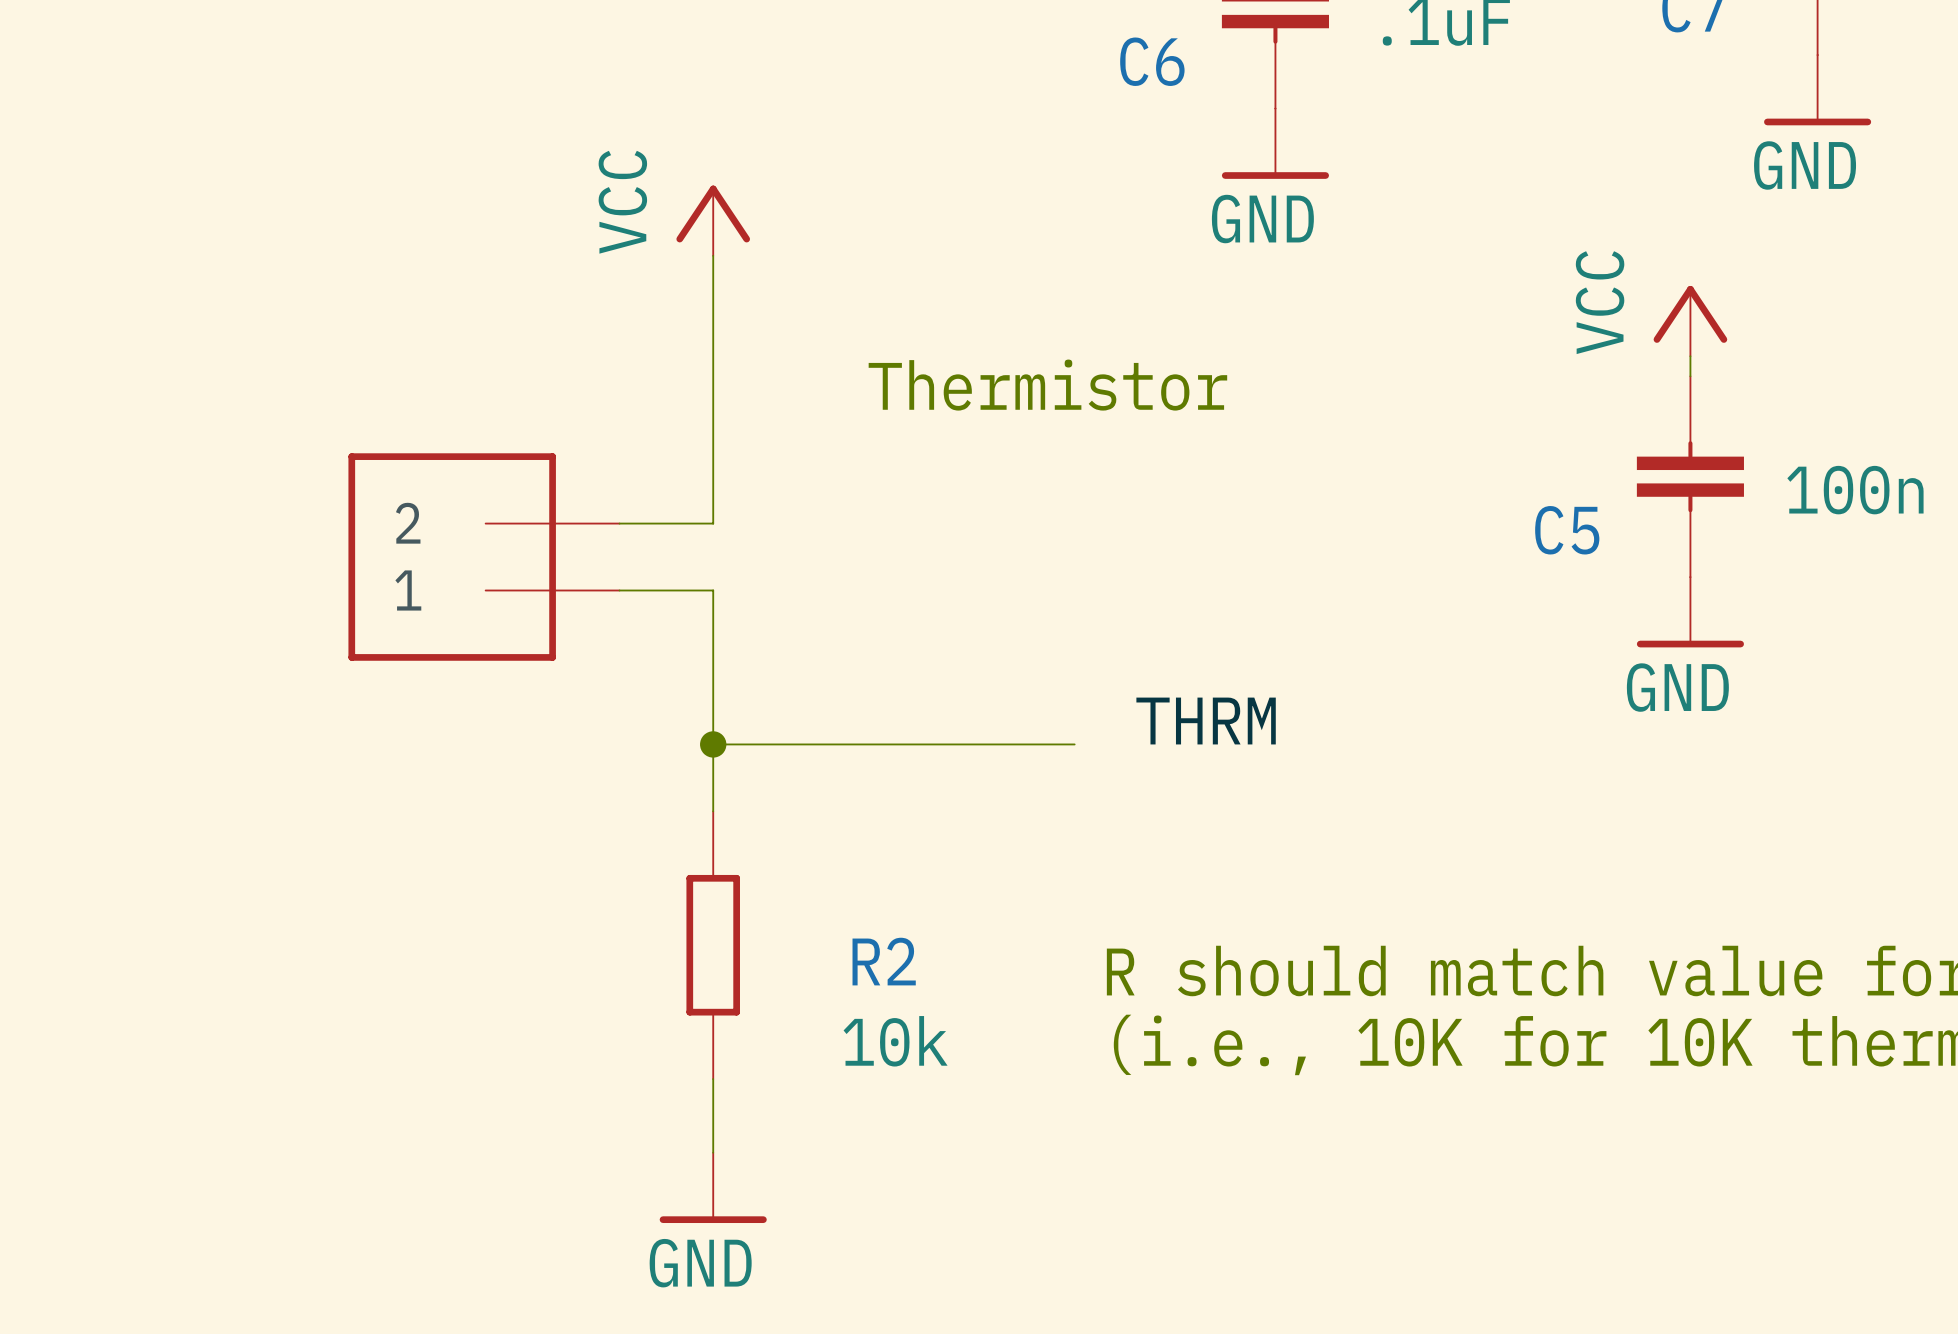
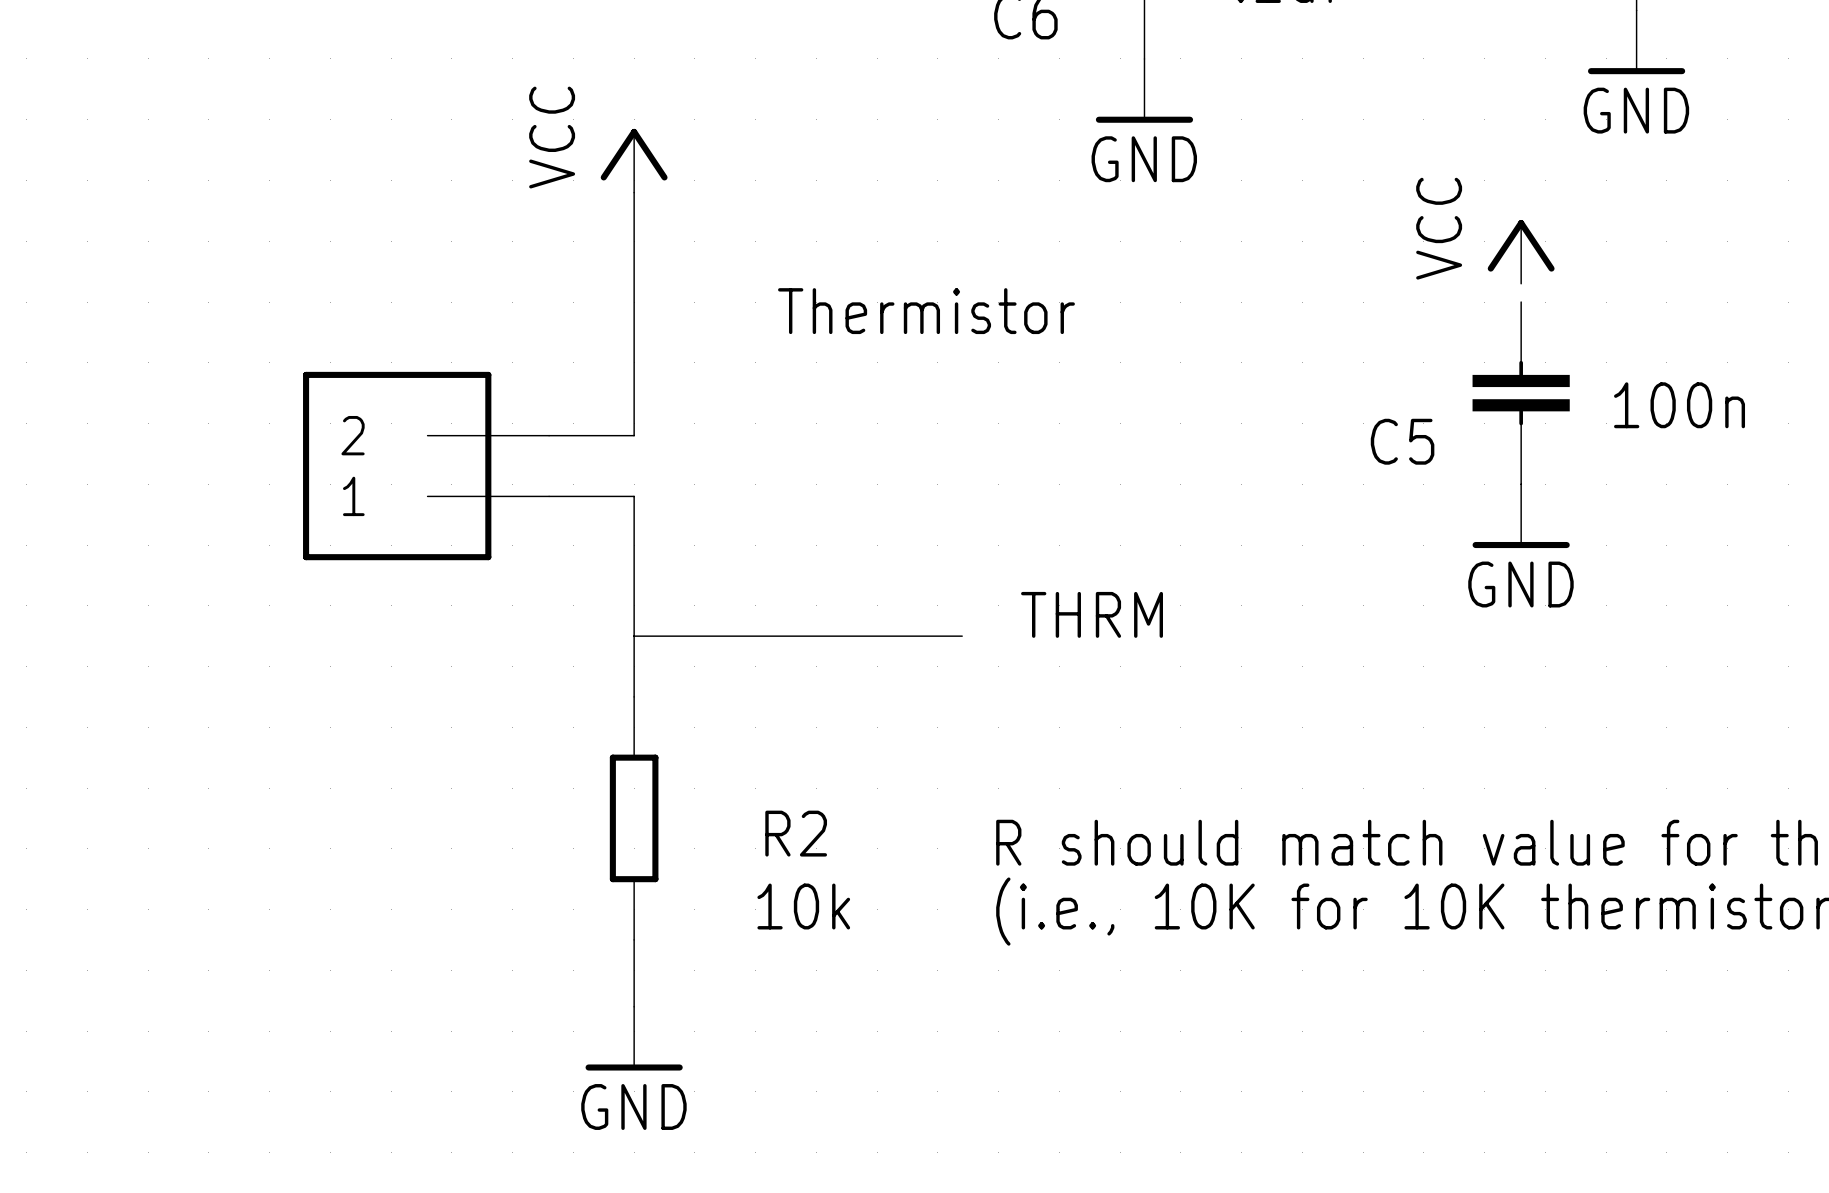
wire: (1690, 356) (1690, 376) -> none
junction: (713, 744) -> none

